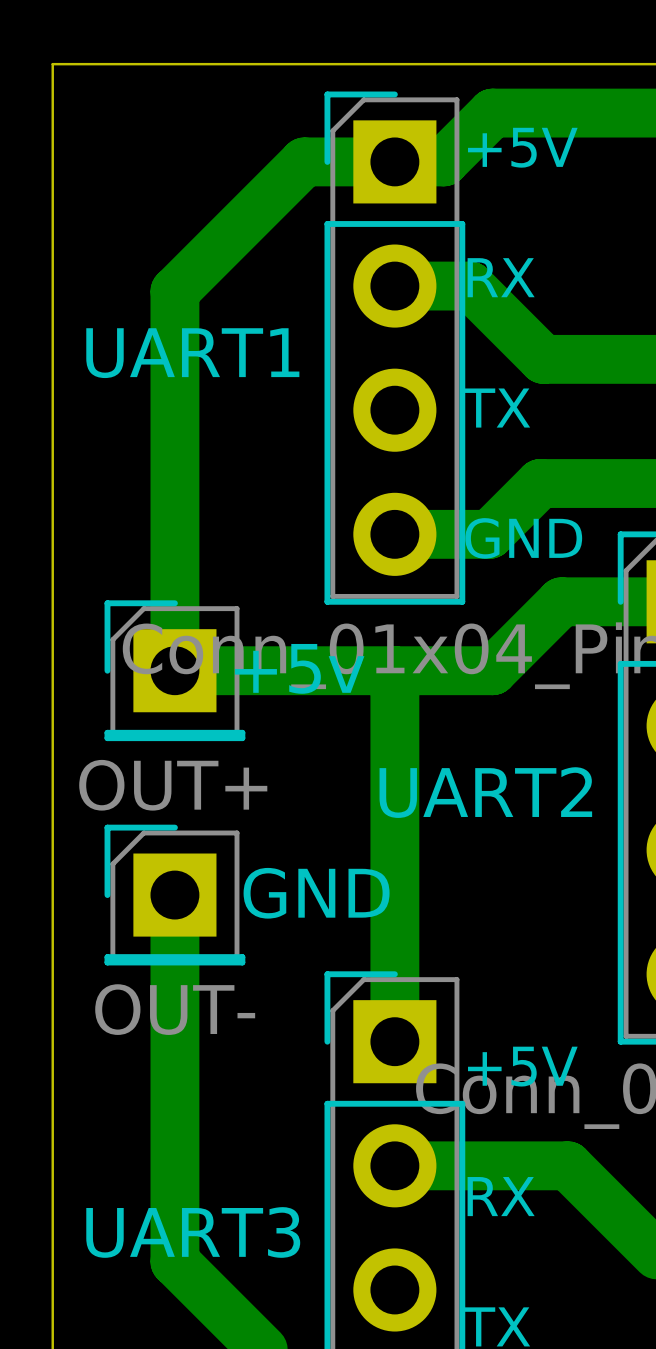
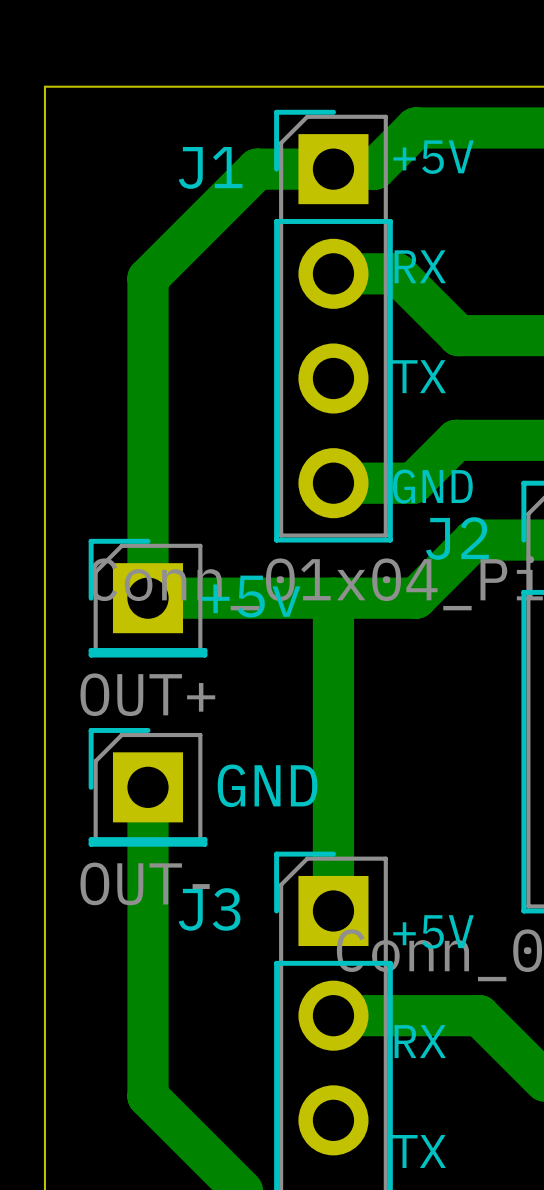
UART1 name: UART1 (192, 353) -> J1 (210, 167)
UART2 name: UART2 (485, 792) -> J2 (457, 538)
UART3 name: UART3 (193, 1232) -> J3 (209, 909)

